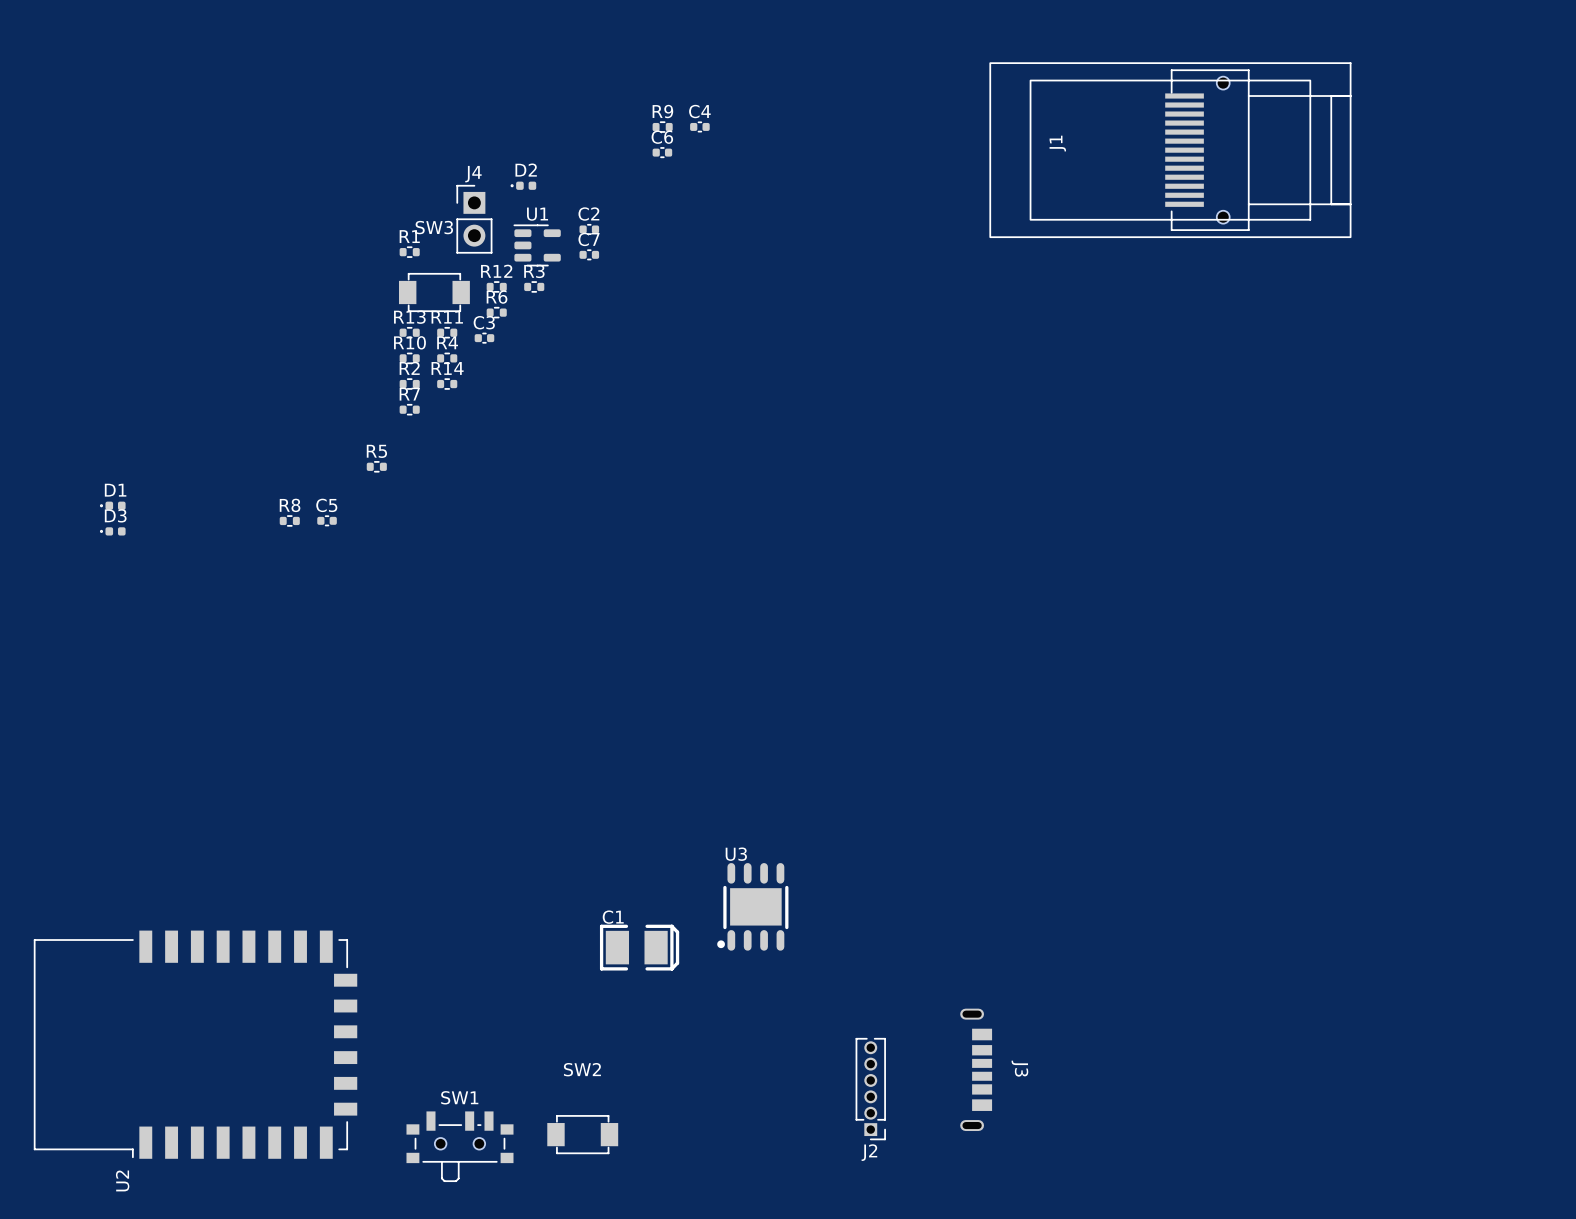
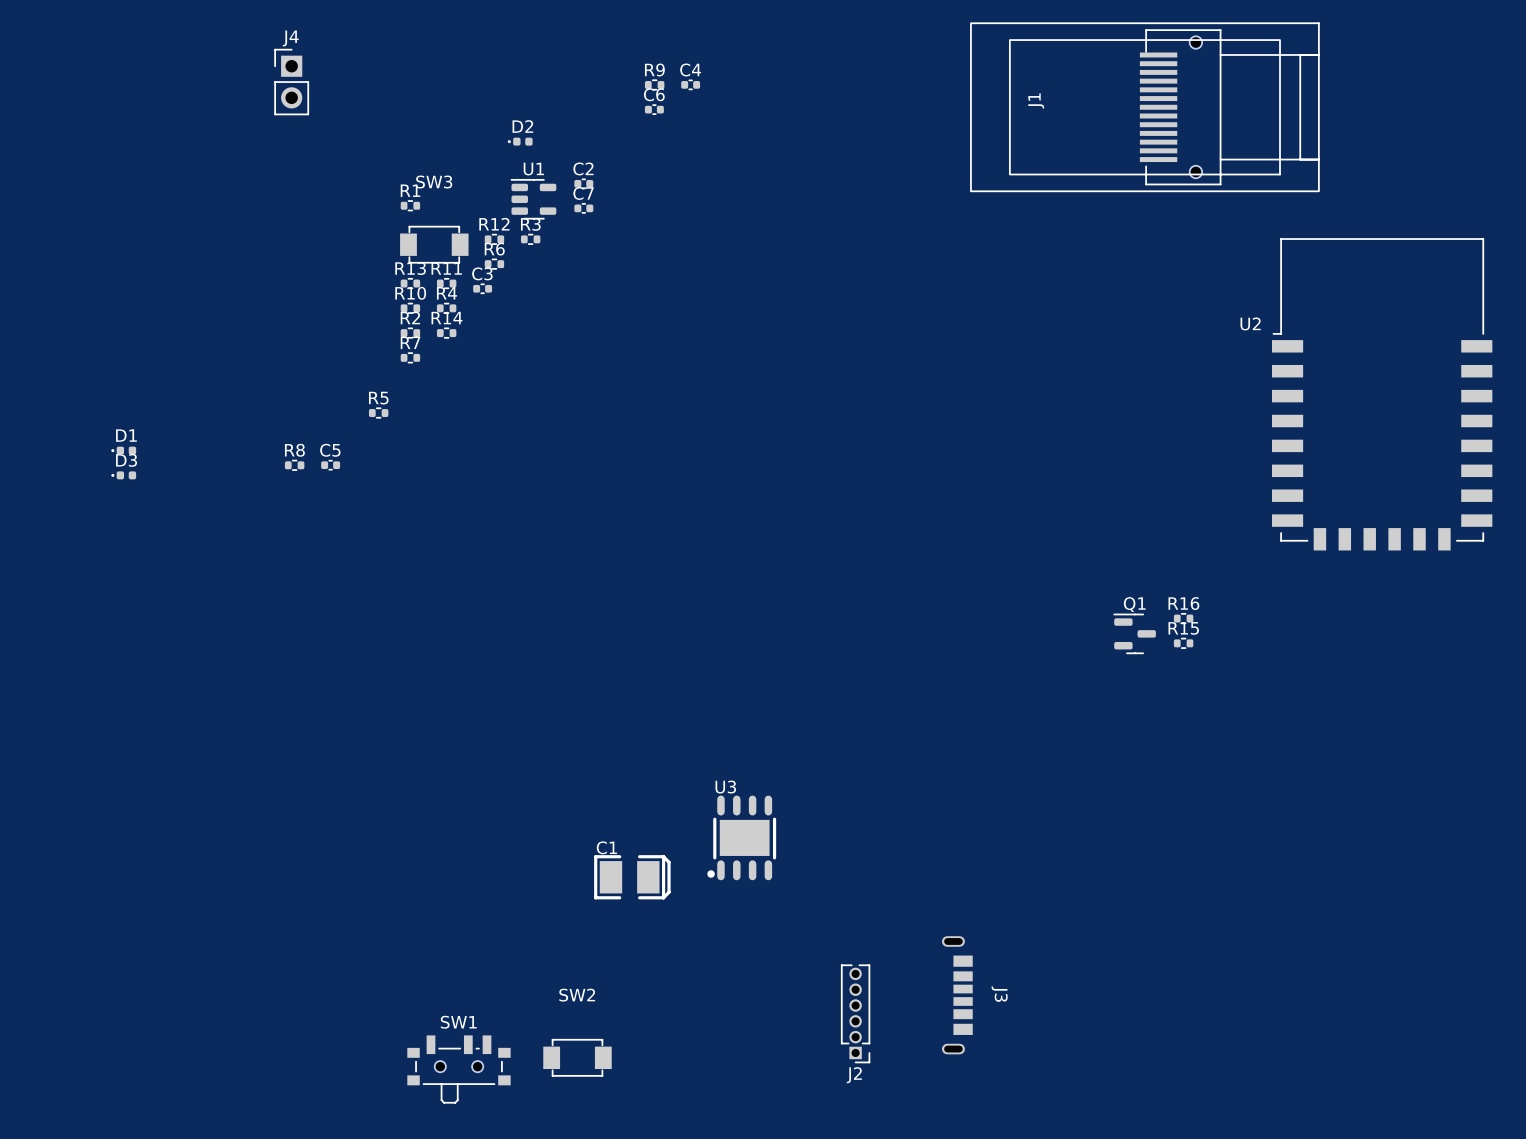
J4 position: (474, 219) -> (291, 82)
R16: none -> (1183, 618)
Q1: none -> (1134, 633)
R15: none -> (1183, 643)
U2 rotation: 0° (195, 1044) -> 90° clockwise (1382, 394)
U2 position: (195, 1044) -> (1382, 394)

